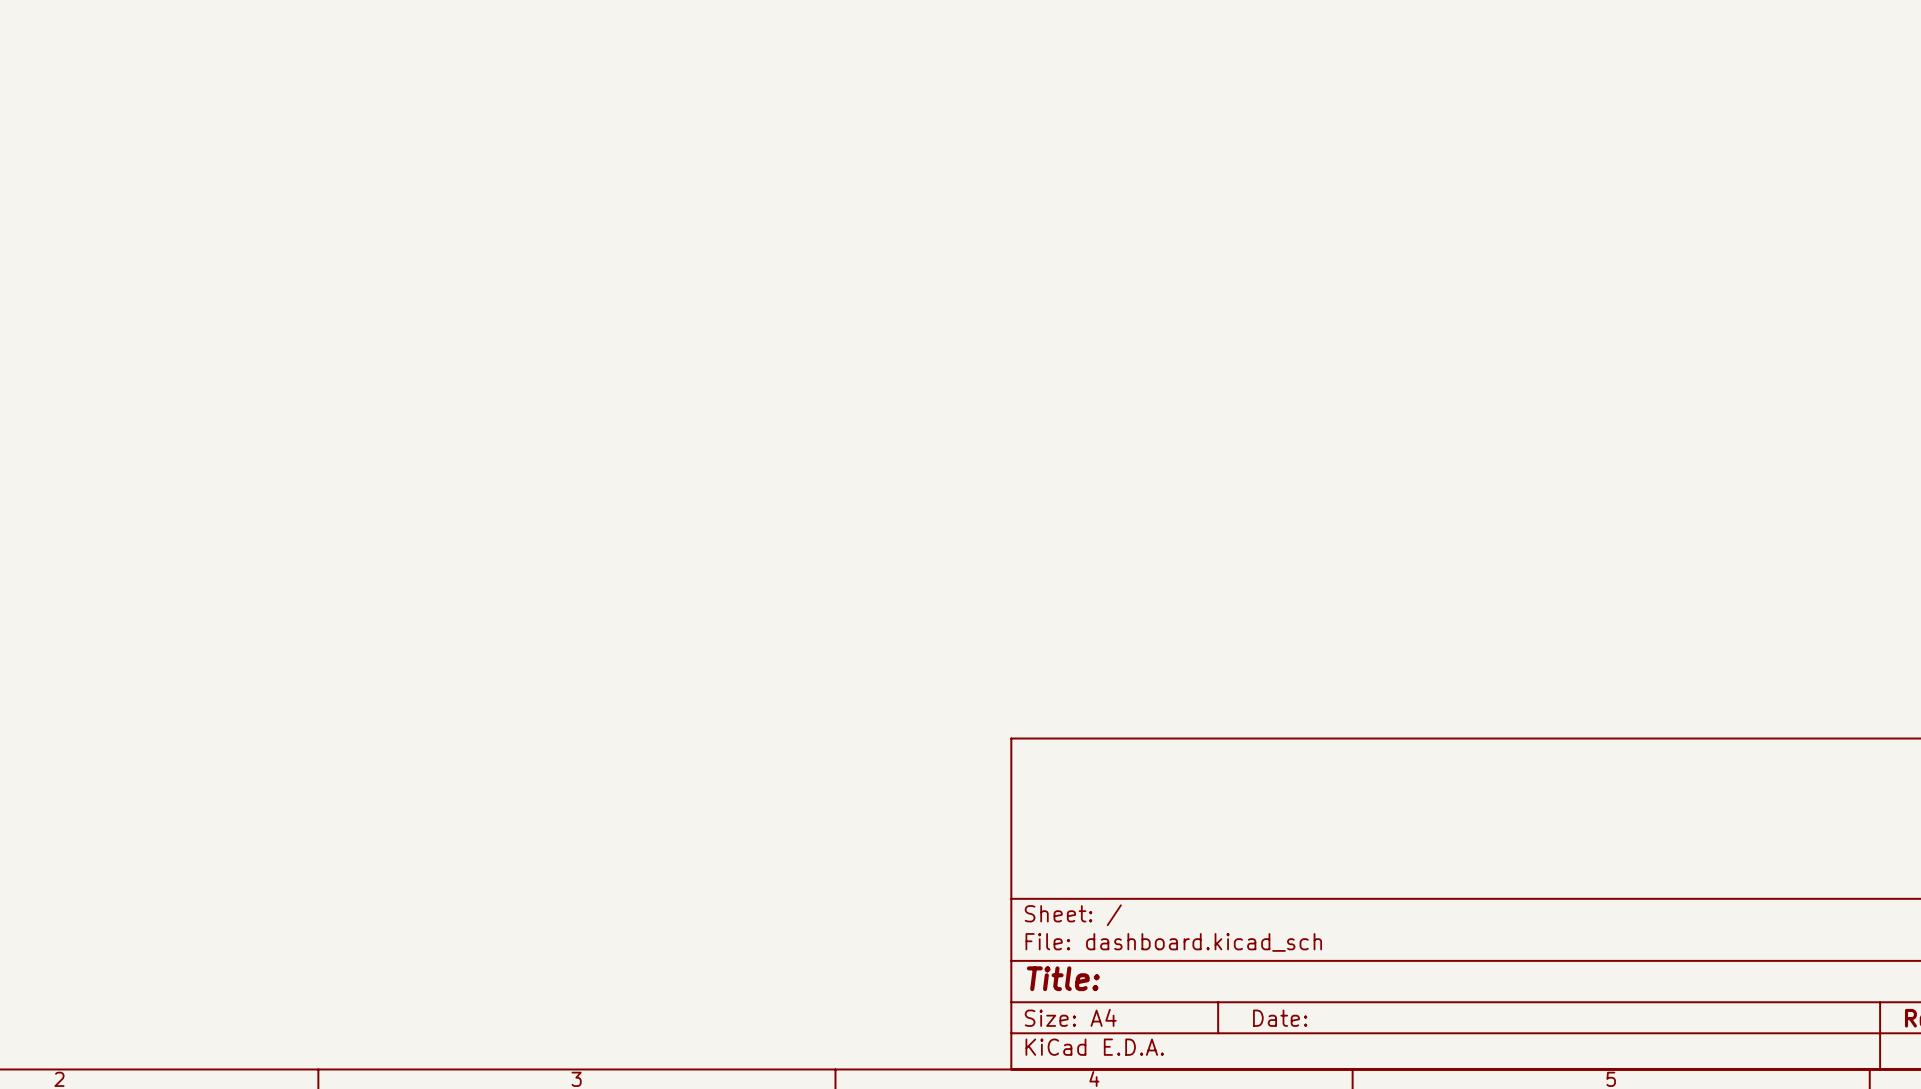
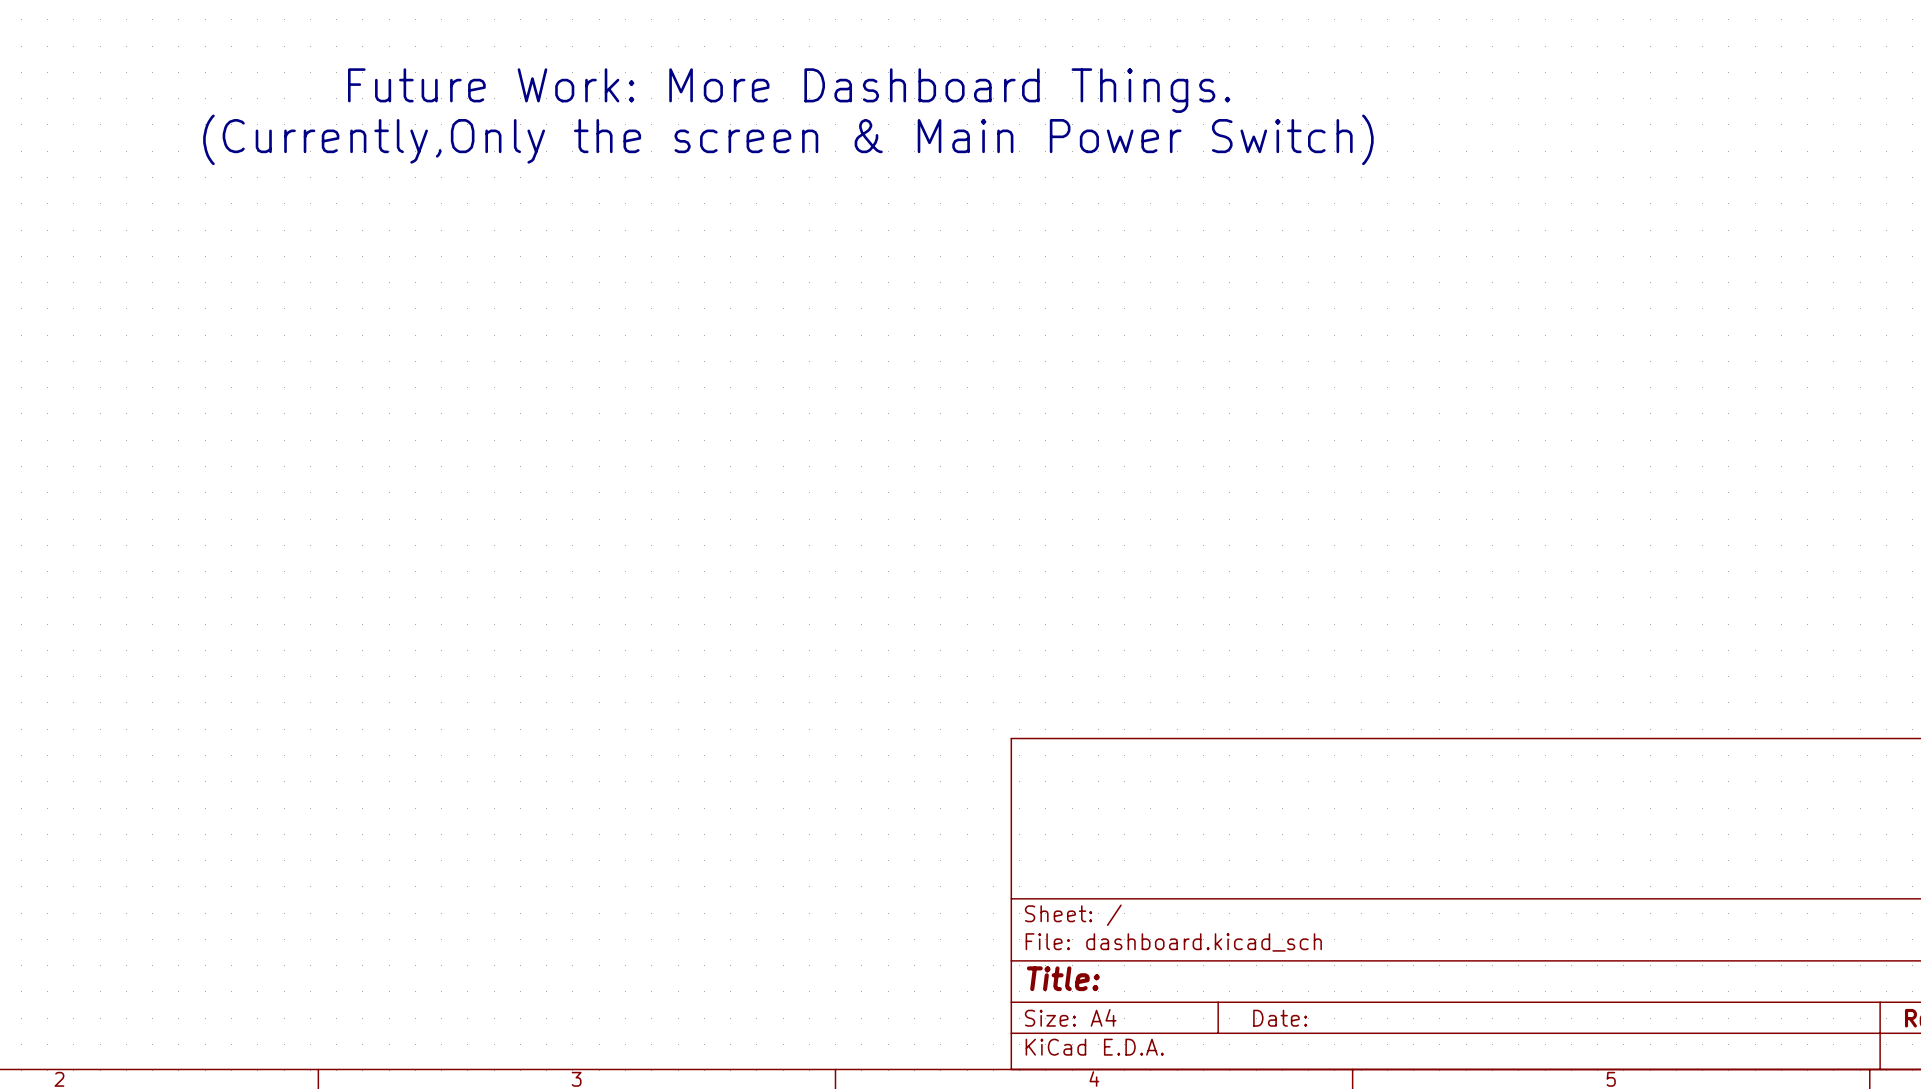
text: none -> Future Work: More Dashboard Things. (789, 90)
text: none -> (Currently,Only the screen & Main Power Switch) (788, 139)

